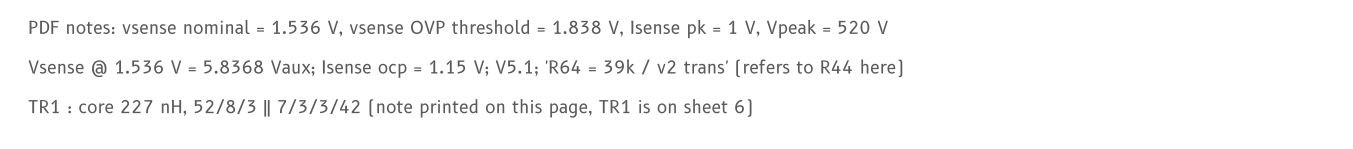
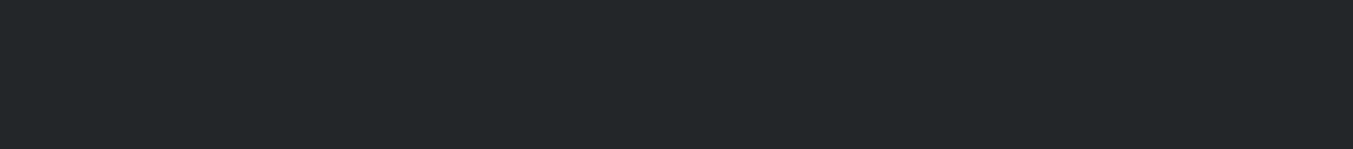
text: PDF notes: vsense nominal = 1.536 V, vsense OVP threshold = 1.838 V, Isense pk = 1 V, Vpeak = 520 V (458, 29) -> none
text: Vsense @ 1.536 V = 5.8368 Vaux; Isense ocp = 1.15 V; V5.1; 'R64 = 39k / v2 trans' (refers to R44 here) (465, 68) -> none
text: TR1 : core 227 nH, 52/8/3 || 7/3/3/42 (note printed on this page, TR1 is on sheet 6) (390, 108) -> none

